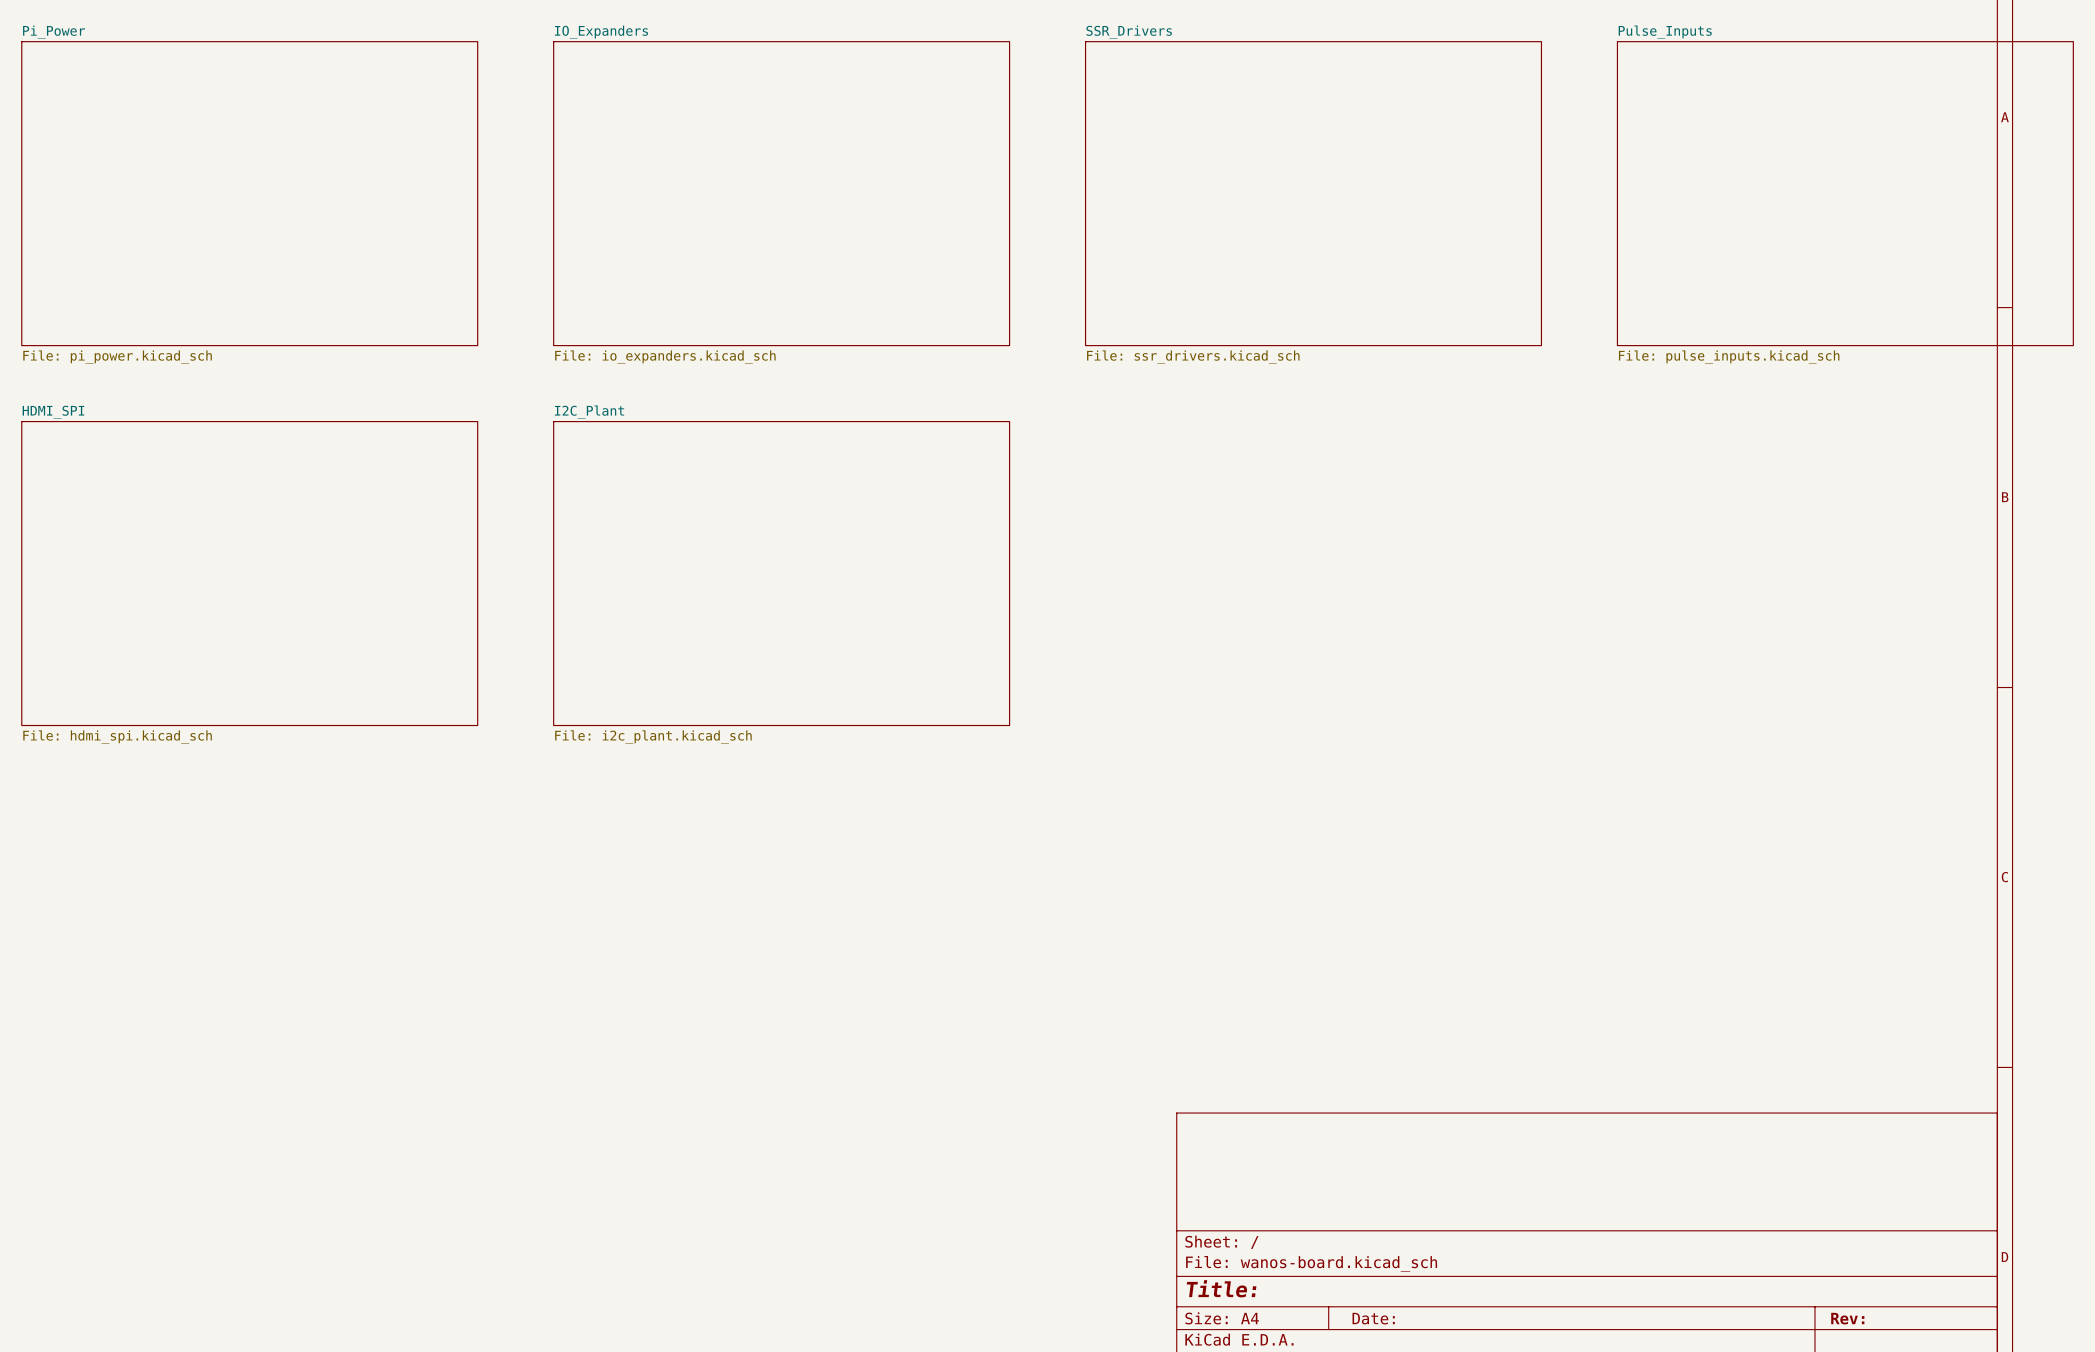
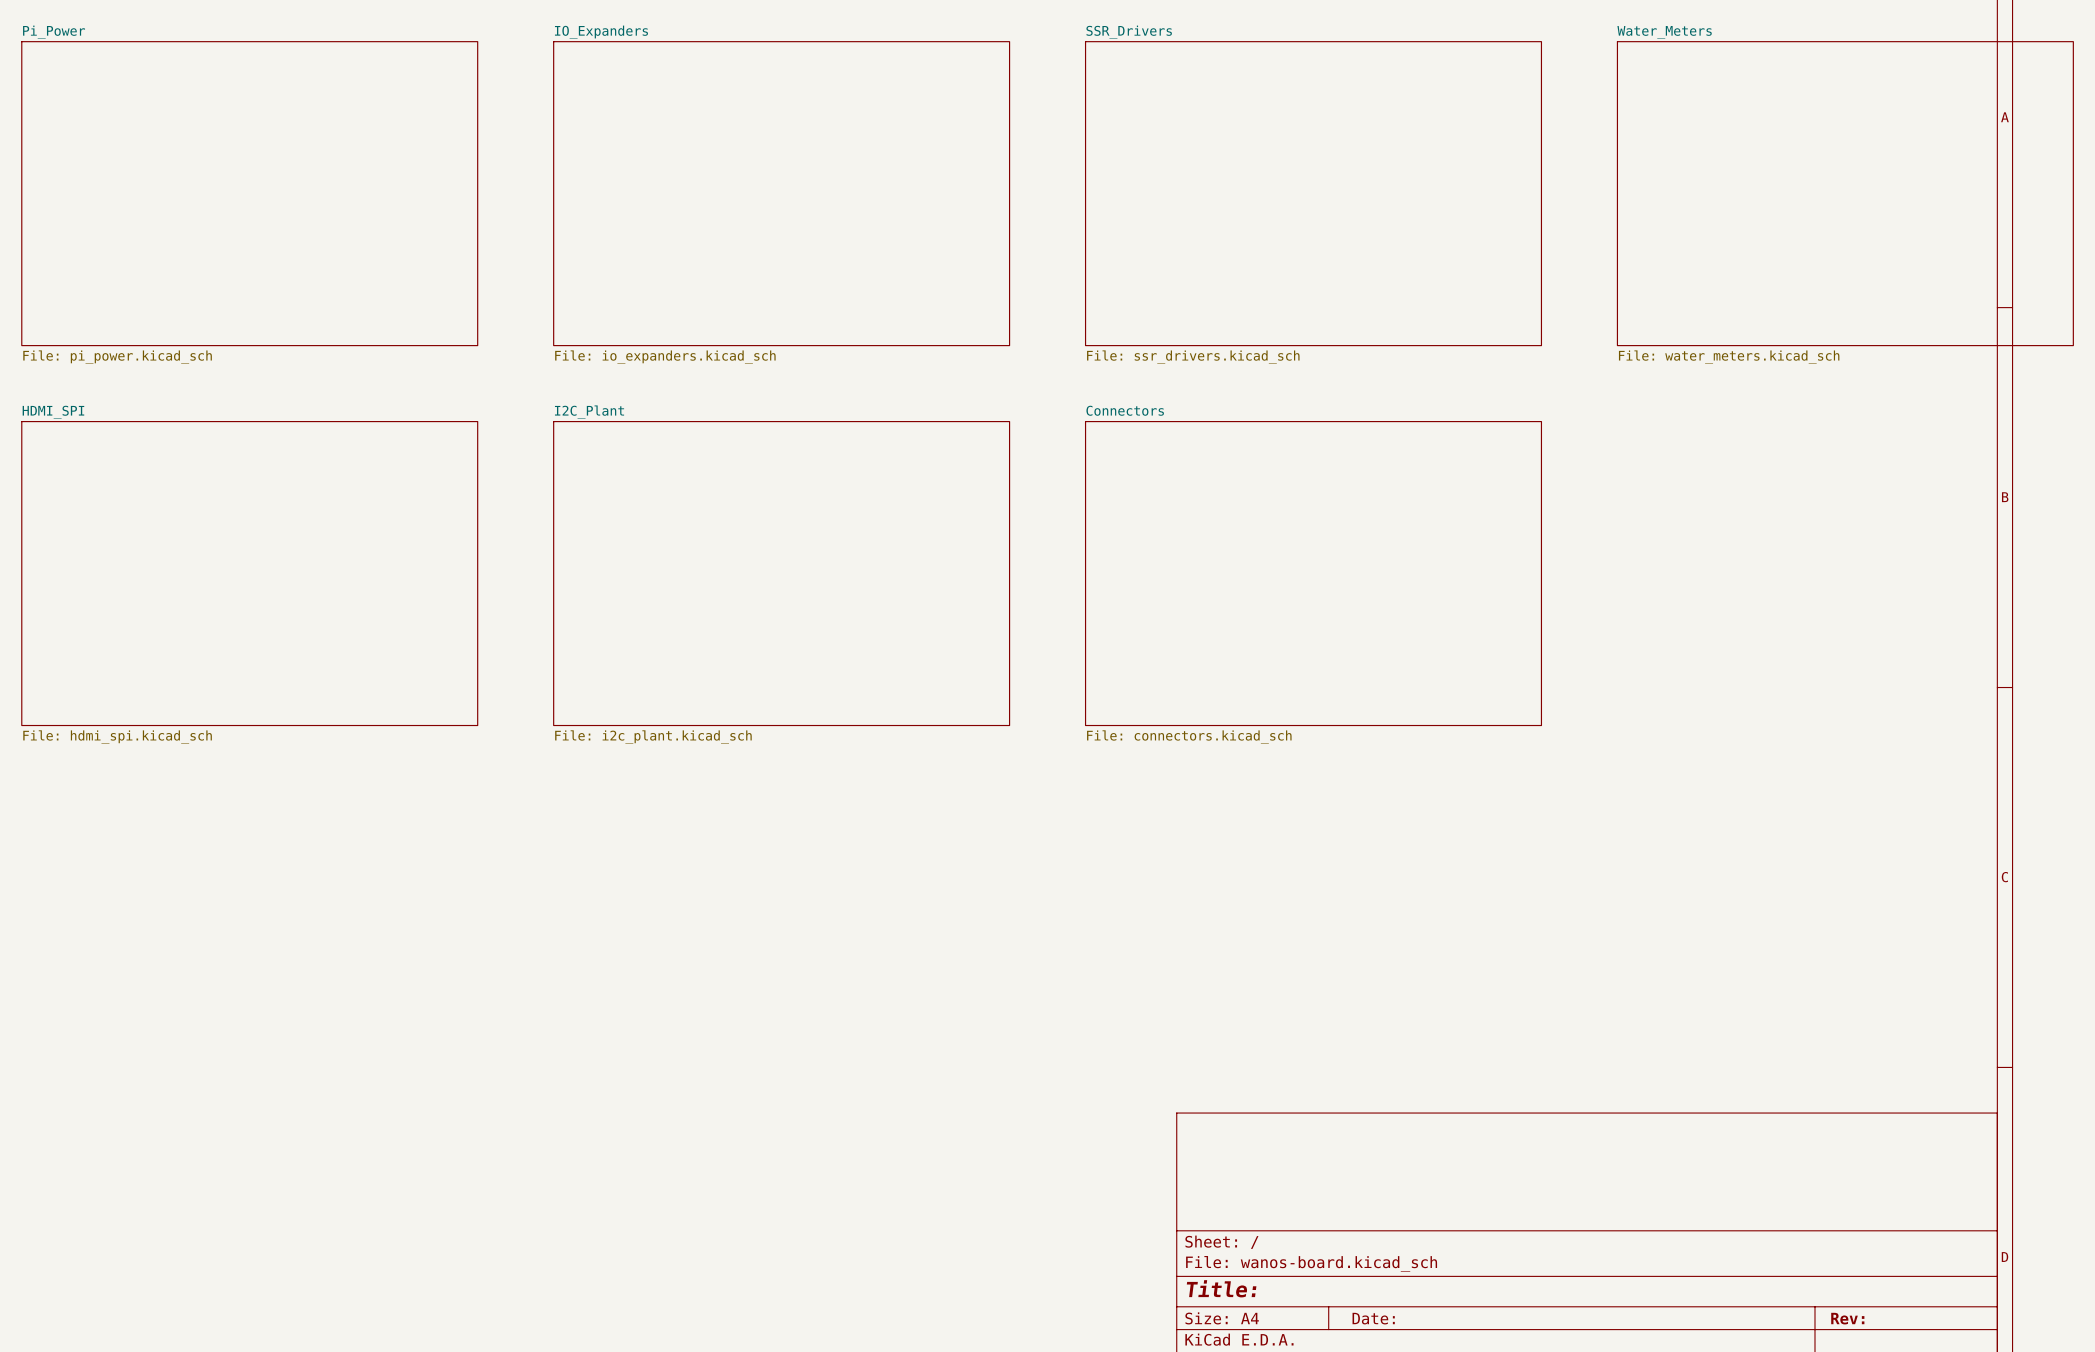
sheet Pulse_Inputs name: Pulse_Inputs (1665, 32) -> Water_Meters (1664, 32)
sheet Pulse_Inputs value: File: pulse_inputs.kicad_sch (1729, 357) -> File: water_meters.kicad_sch (1729, 357)
sheet Connectors: none -> File: connectors.kicad_sch (1313, 573)

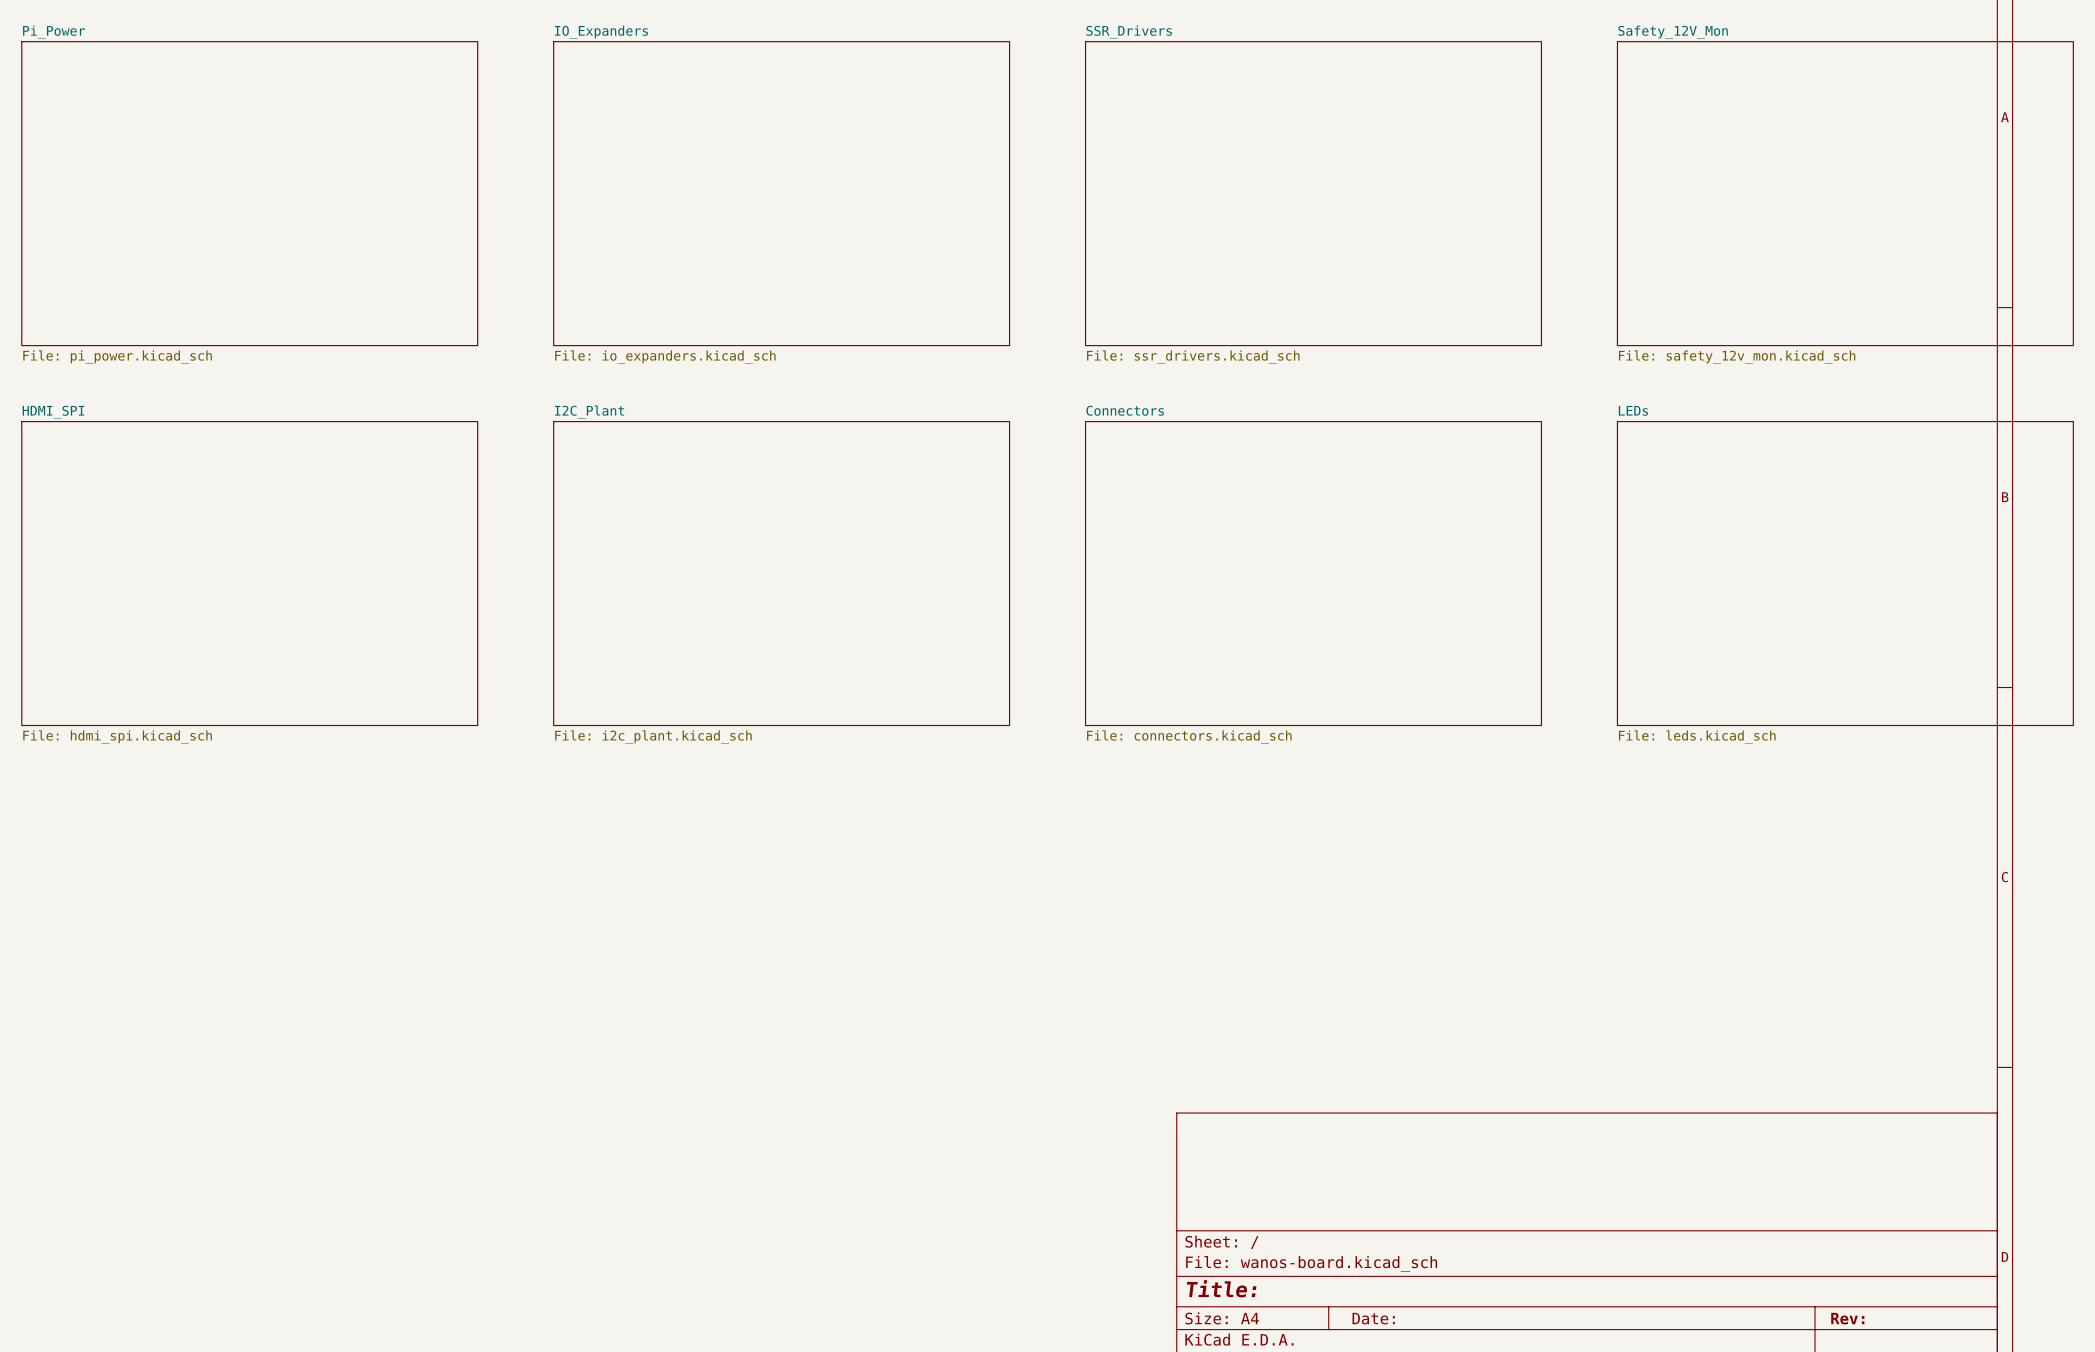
sheet Water_Meters name: Water_Meters (1664, 32) -> Safety_12V_Mon (1673, 32)
sheet Water_Meters value: File: water_meters.kicad_sch (1729, 357) -> File: safety_12v_mon.kicad_sch (1737, 357)
sheet LEDs: none -> File: leds.kicad_sch (1845, 573)

